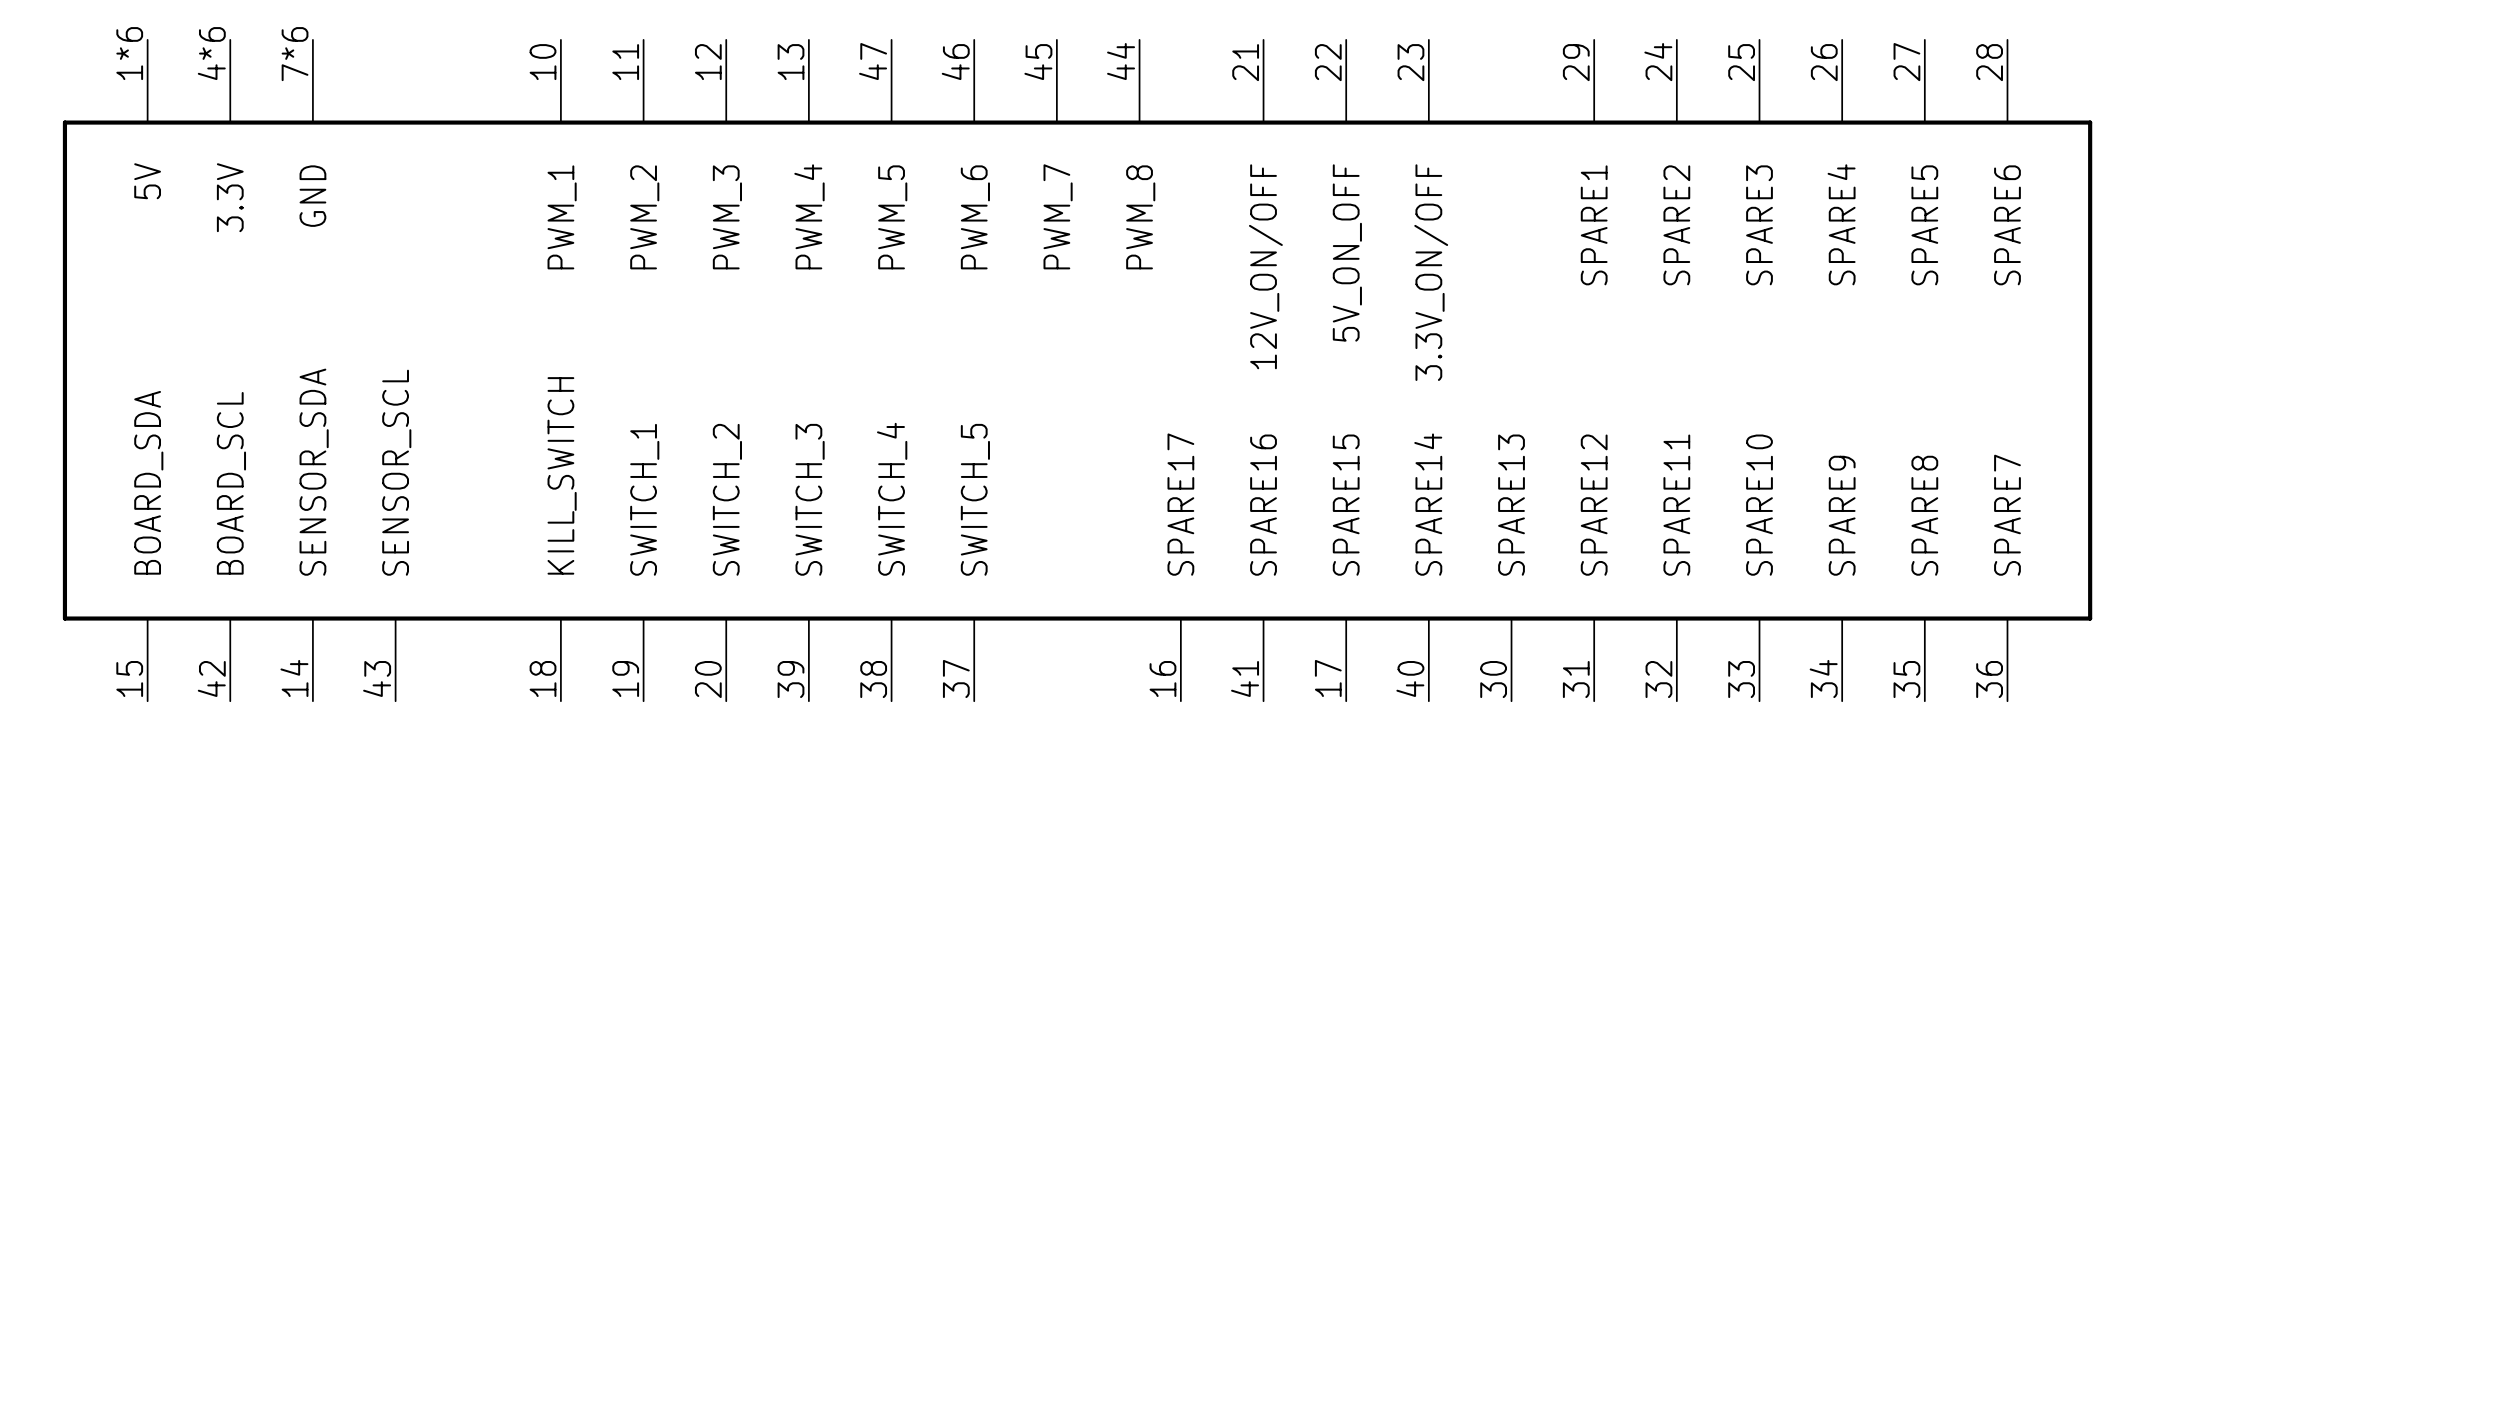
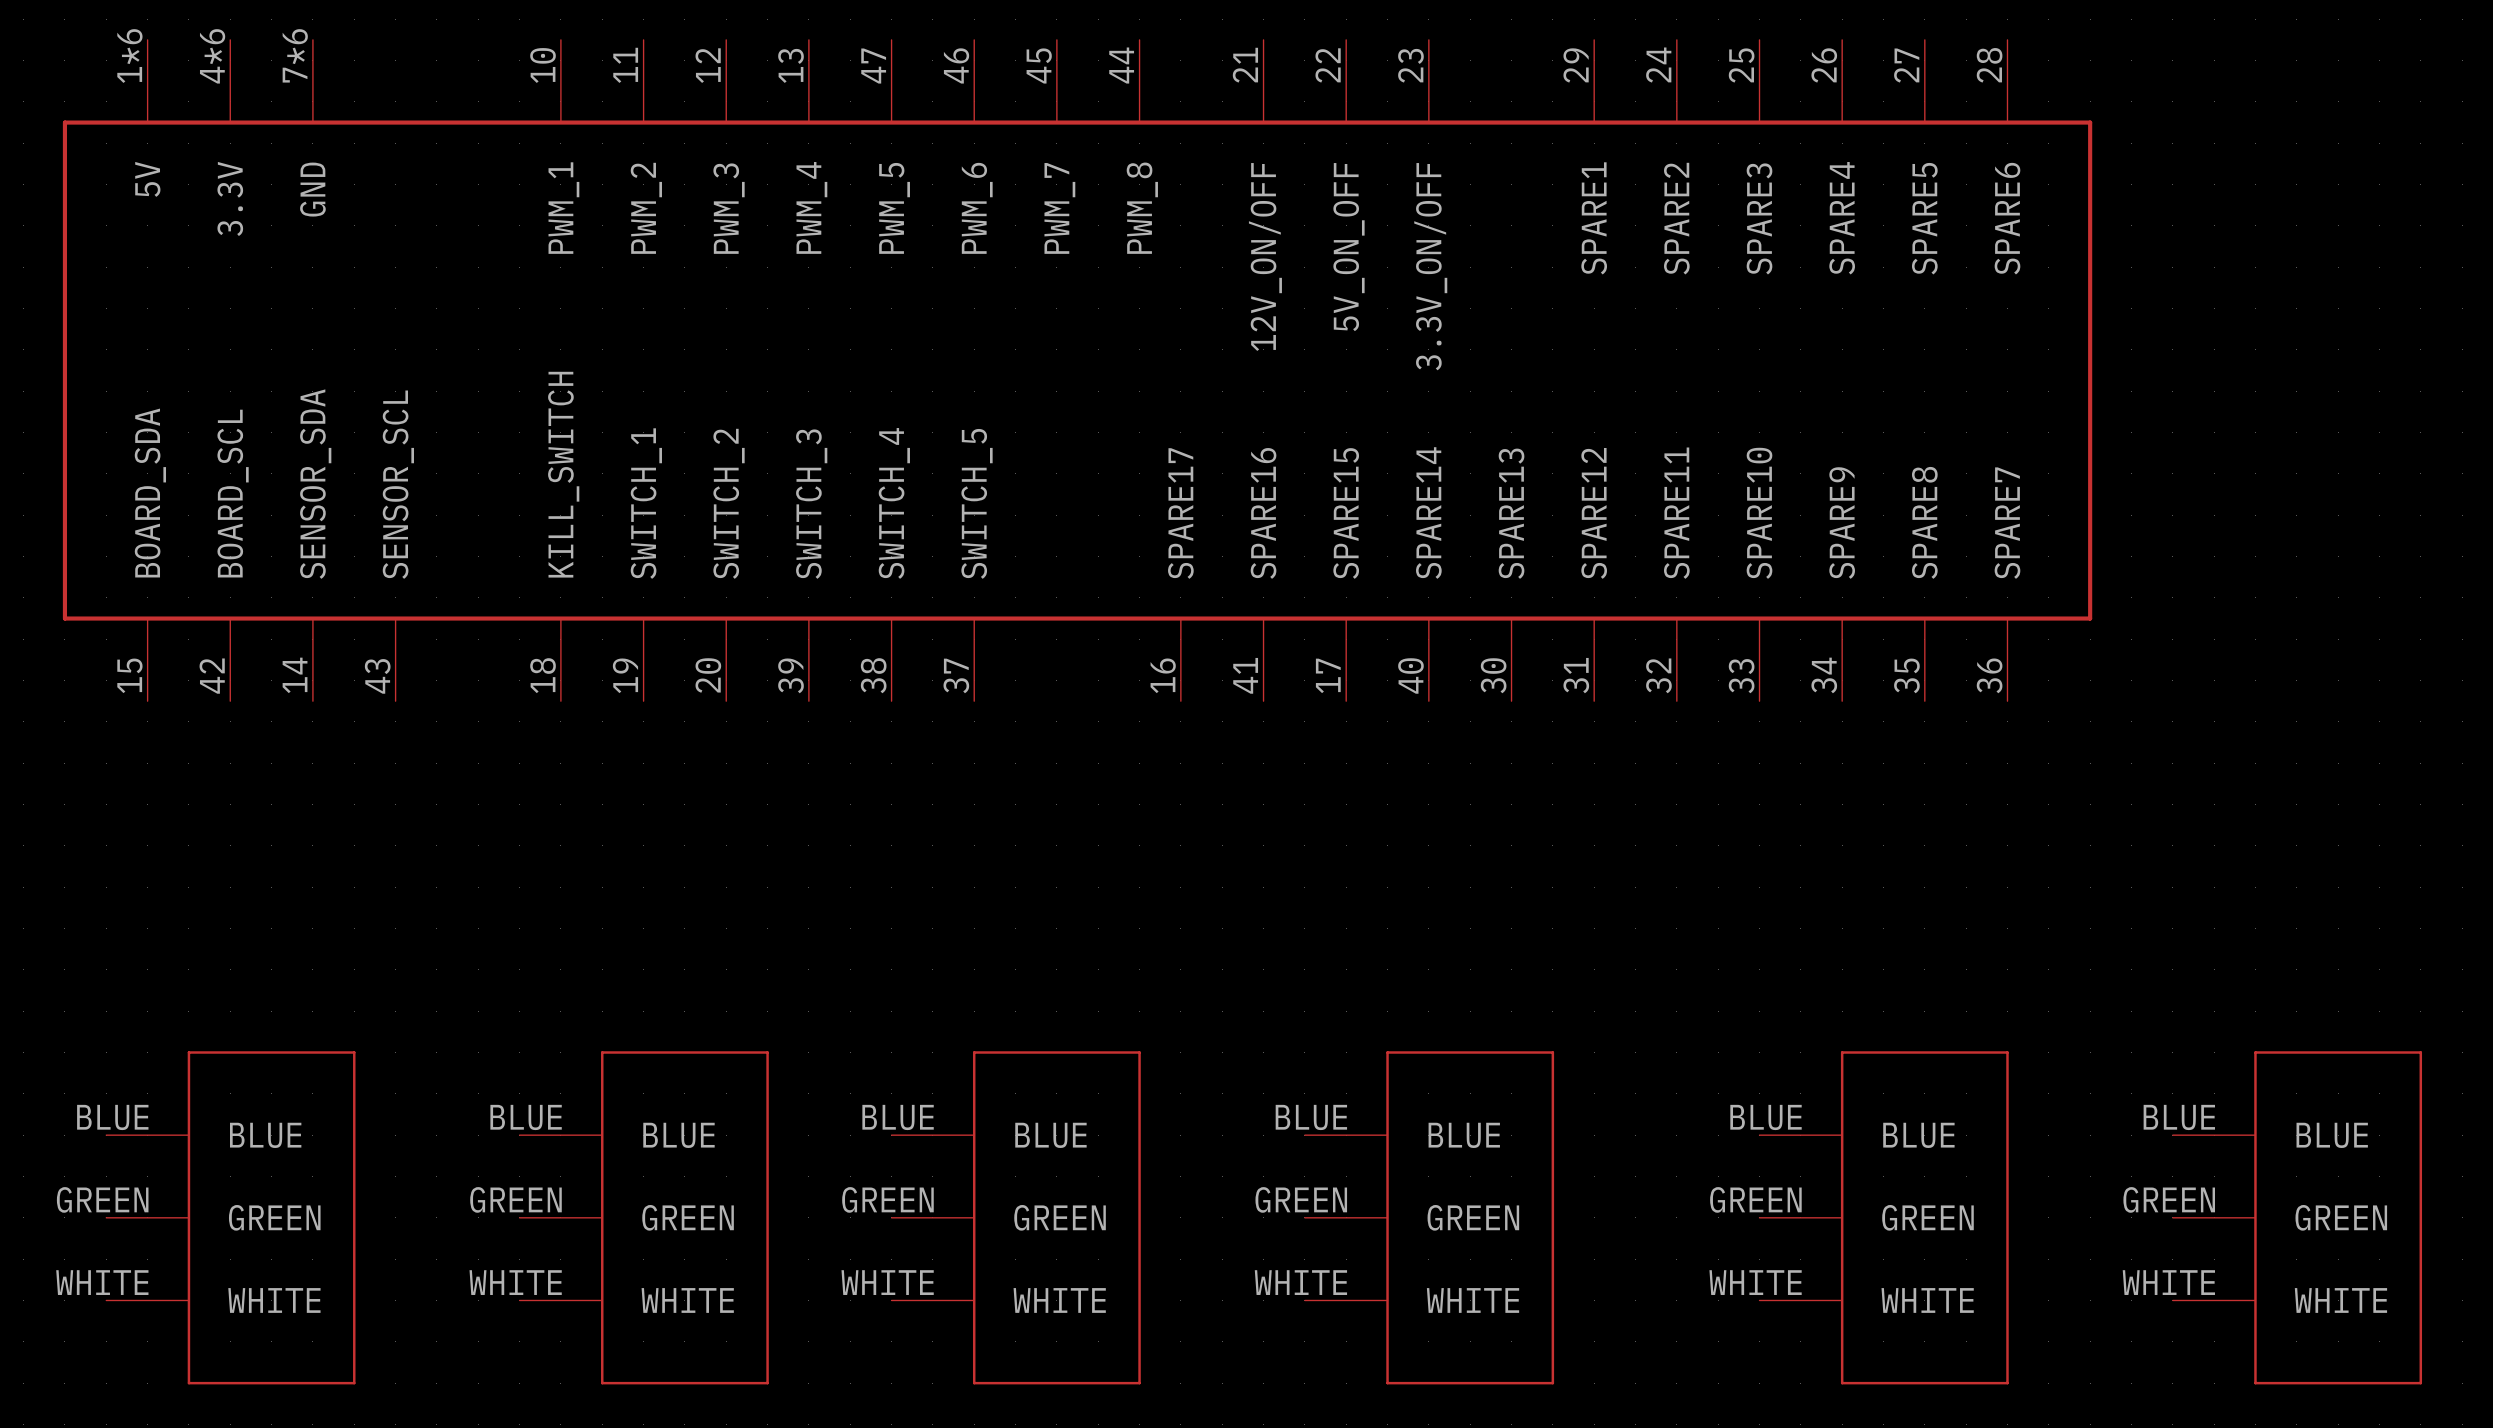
part: none -> (230, 1217)
part: none -> (644, 1217)
part: none -> (1016, 1217)
part: none -> (1429, 1217)
part: none -> (1884, 1217)
part: none -> (2297, 1217)

